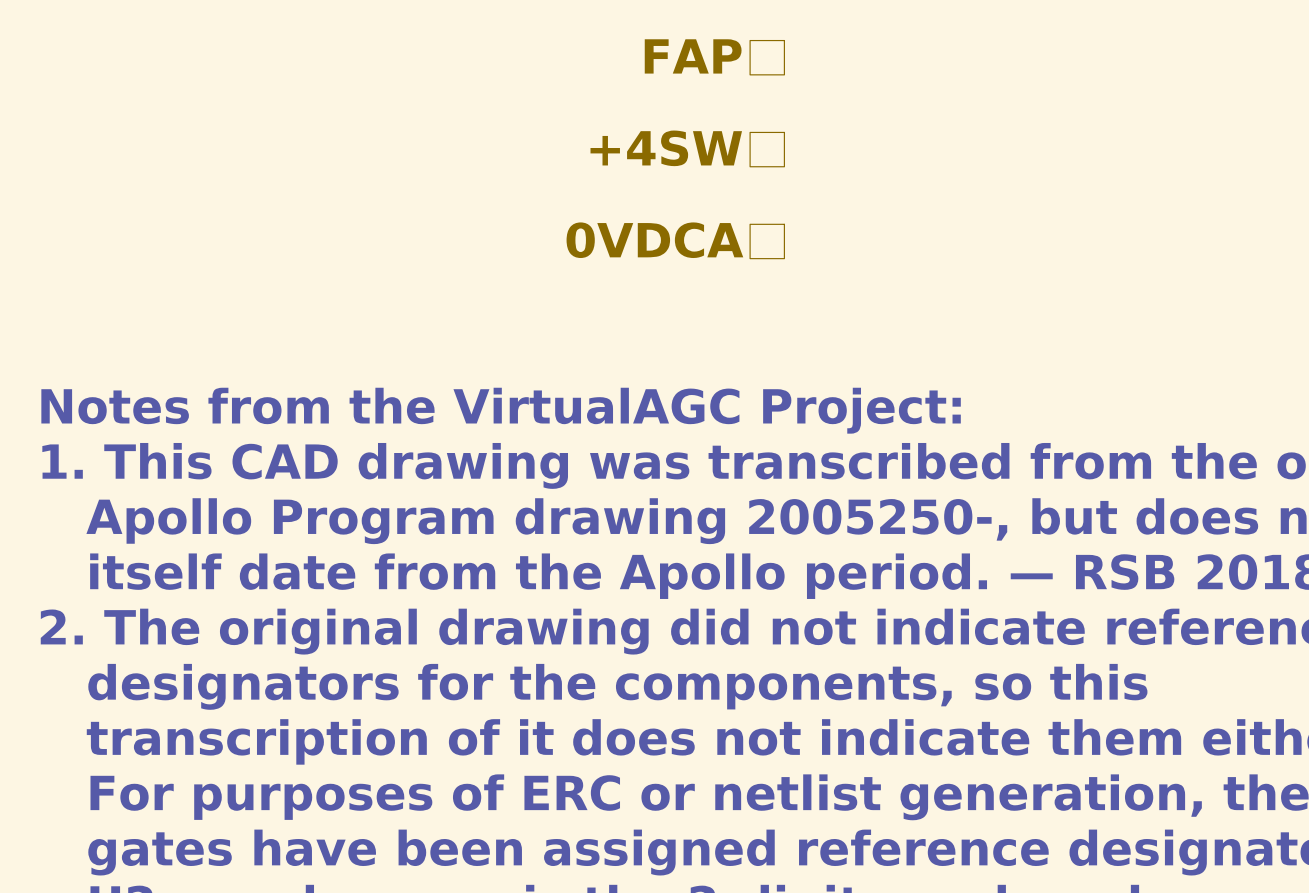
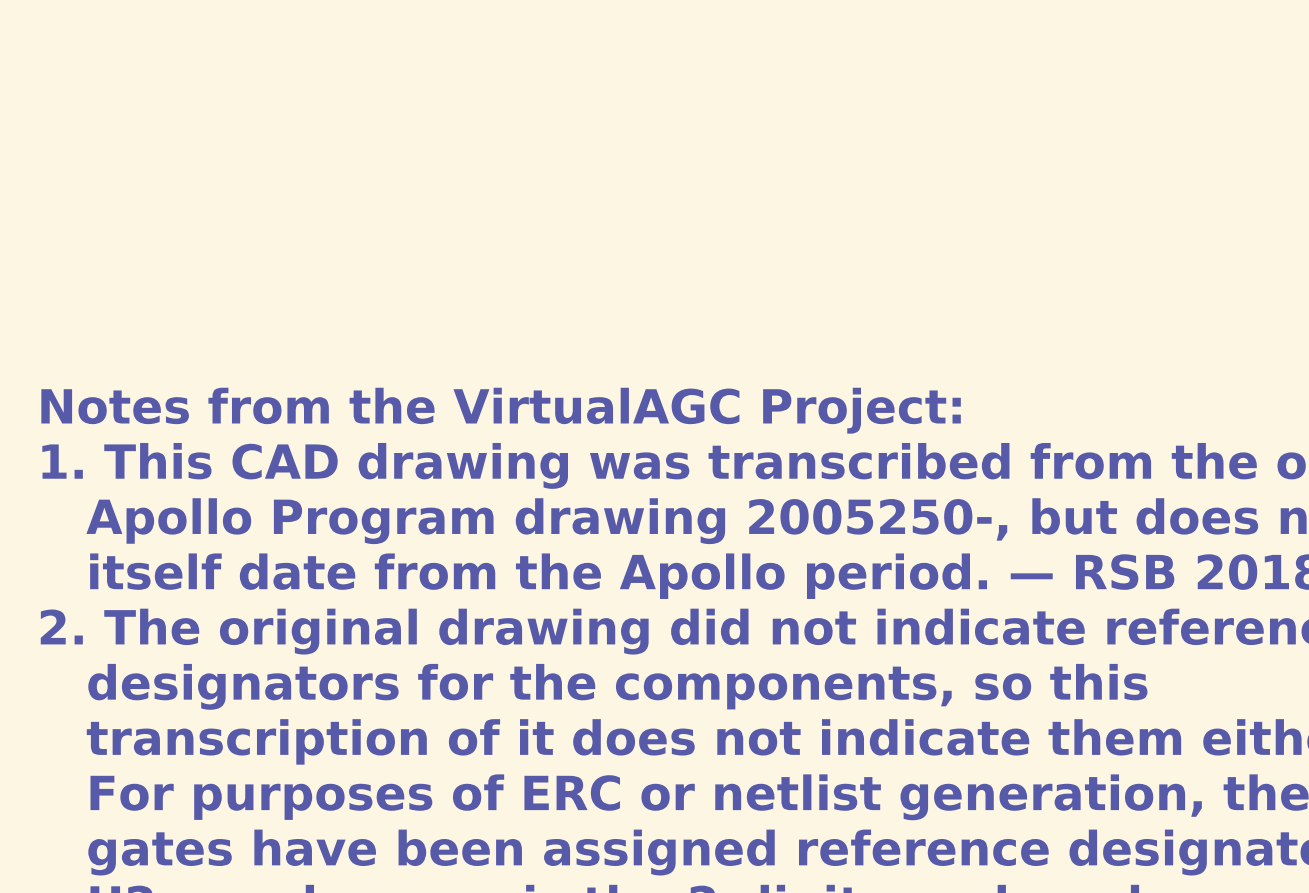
hierarchical label: FAP (693, 56) -> none
hierarchical label: +4SW (666, 148) -> none
hierarchical label: 0VDCA (654, 240) -> none

